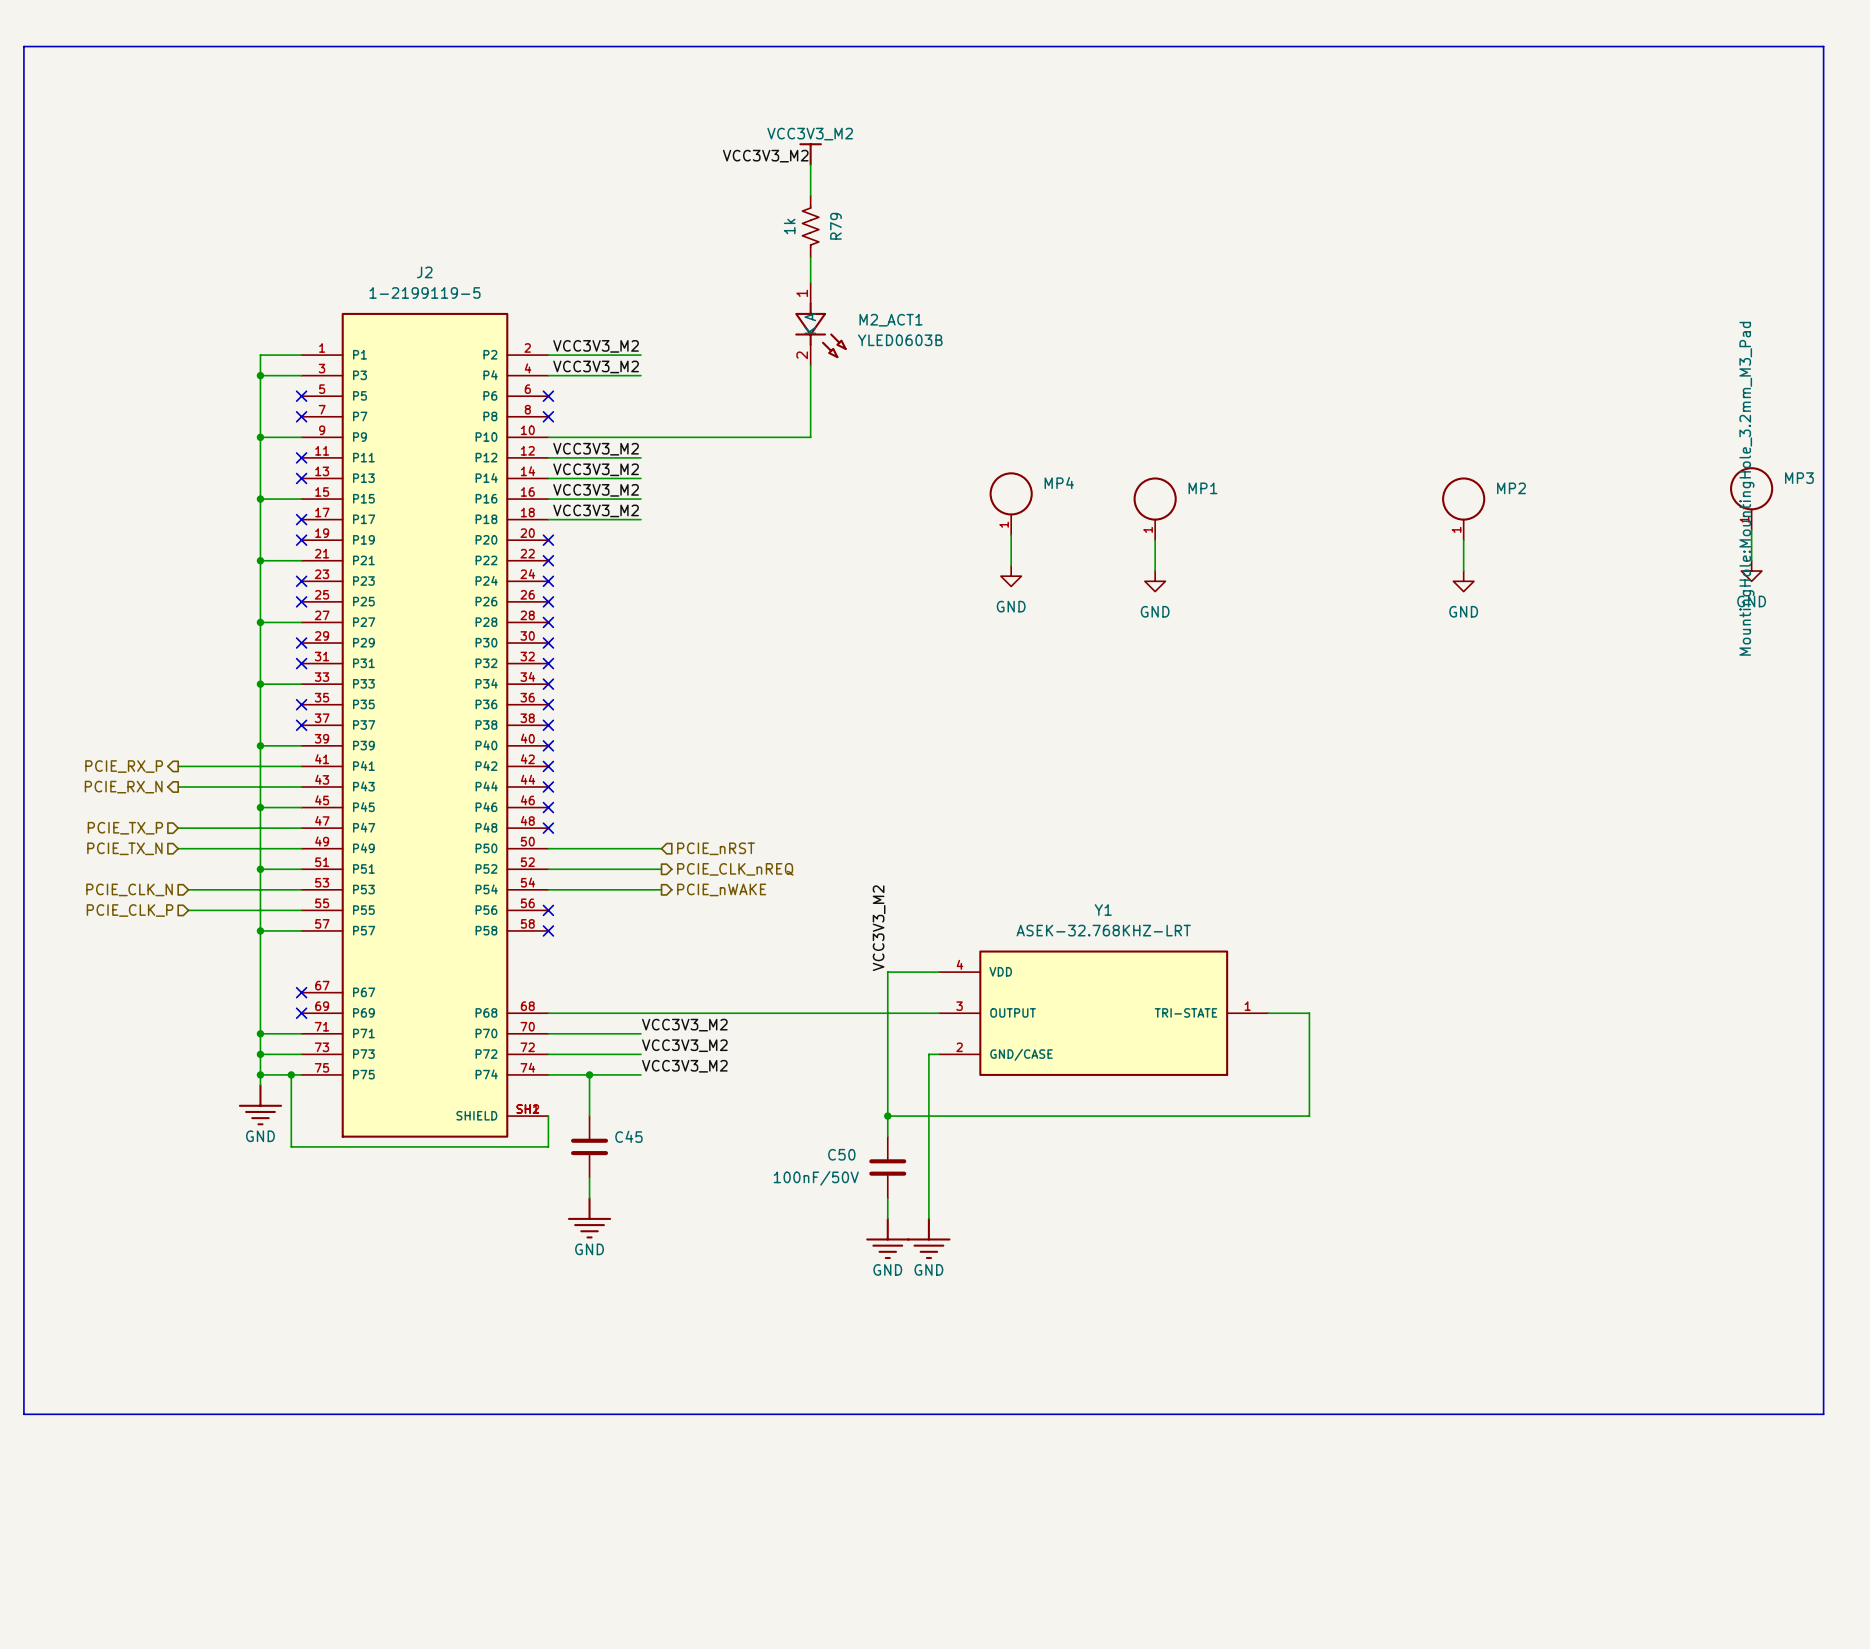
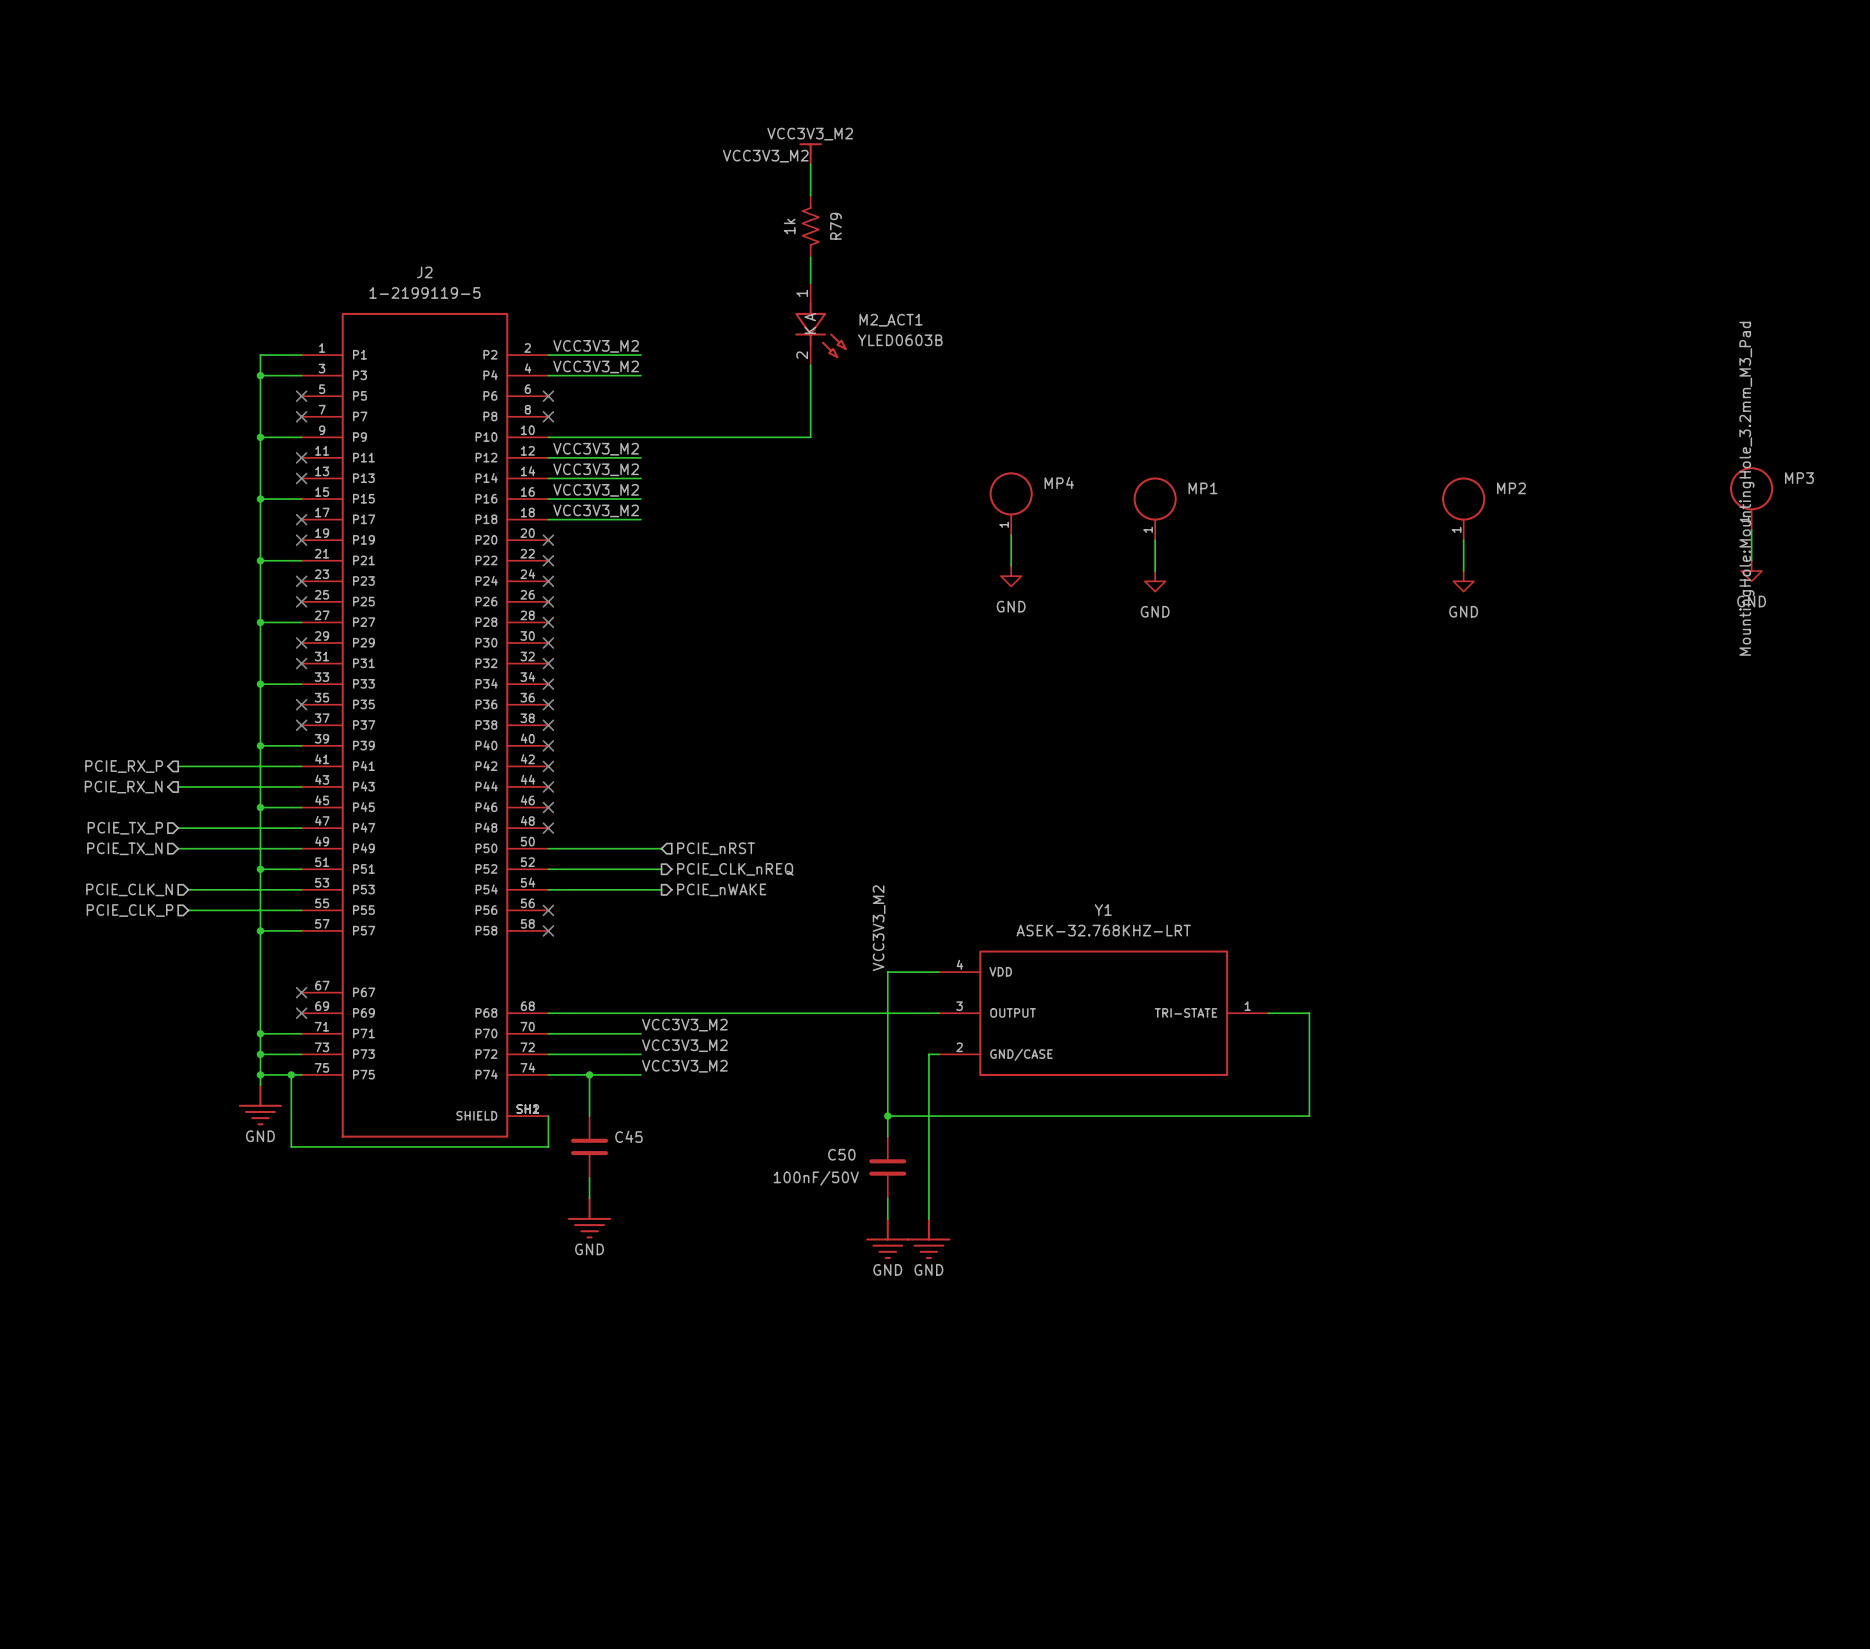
line: (23, 46) (1823, 46) (1823, 1414) (23, 1414) (23, 46) -> none

